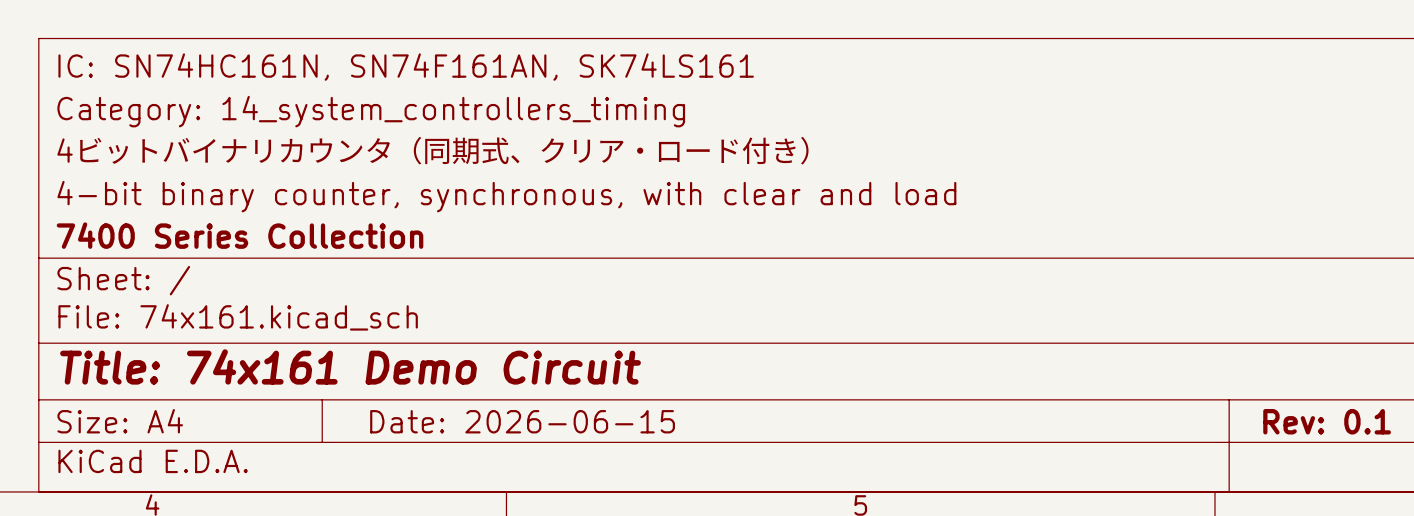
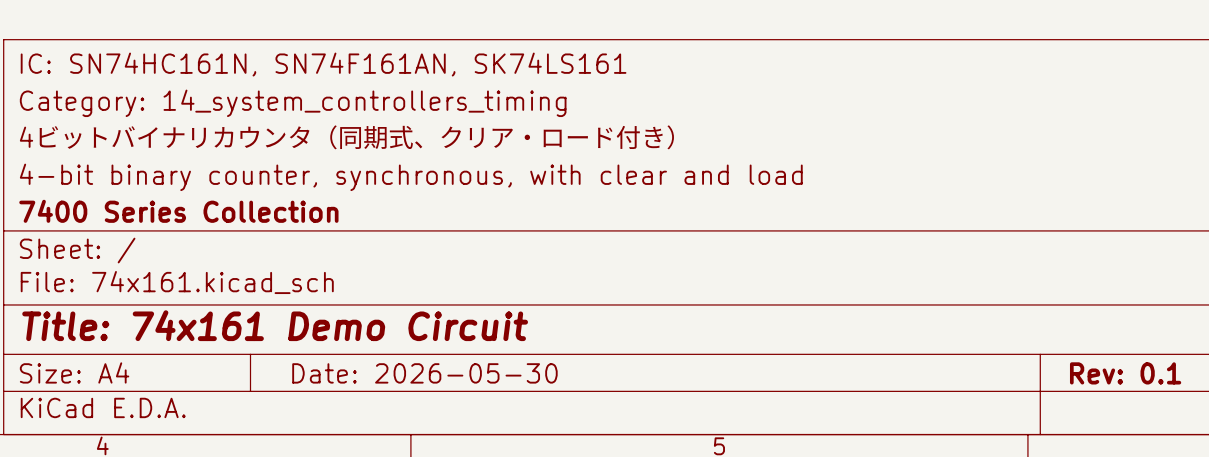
title block: Date: 2026-06-15 (522, 421) -> Date: 2026-05-30 (424, 373)

